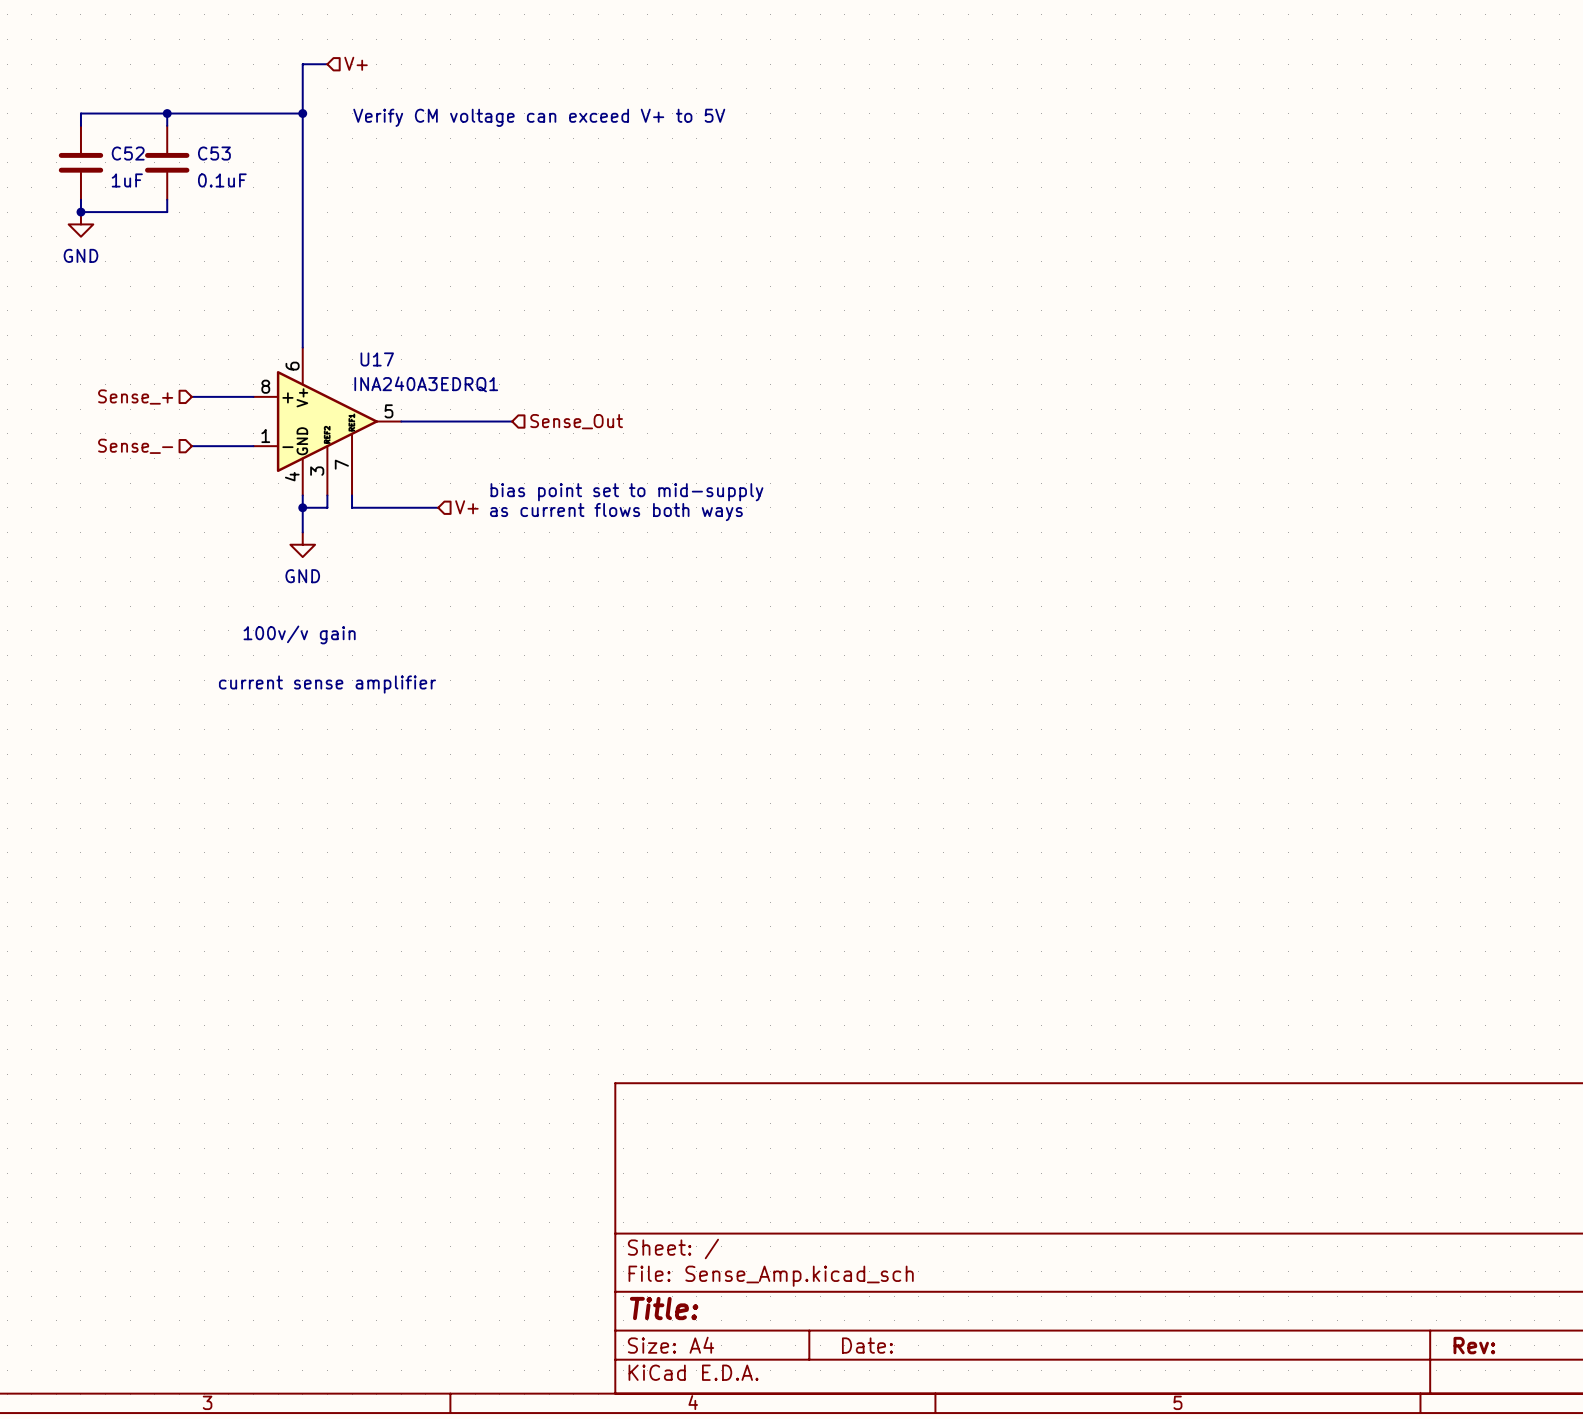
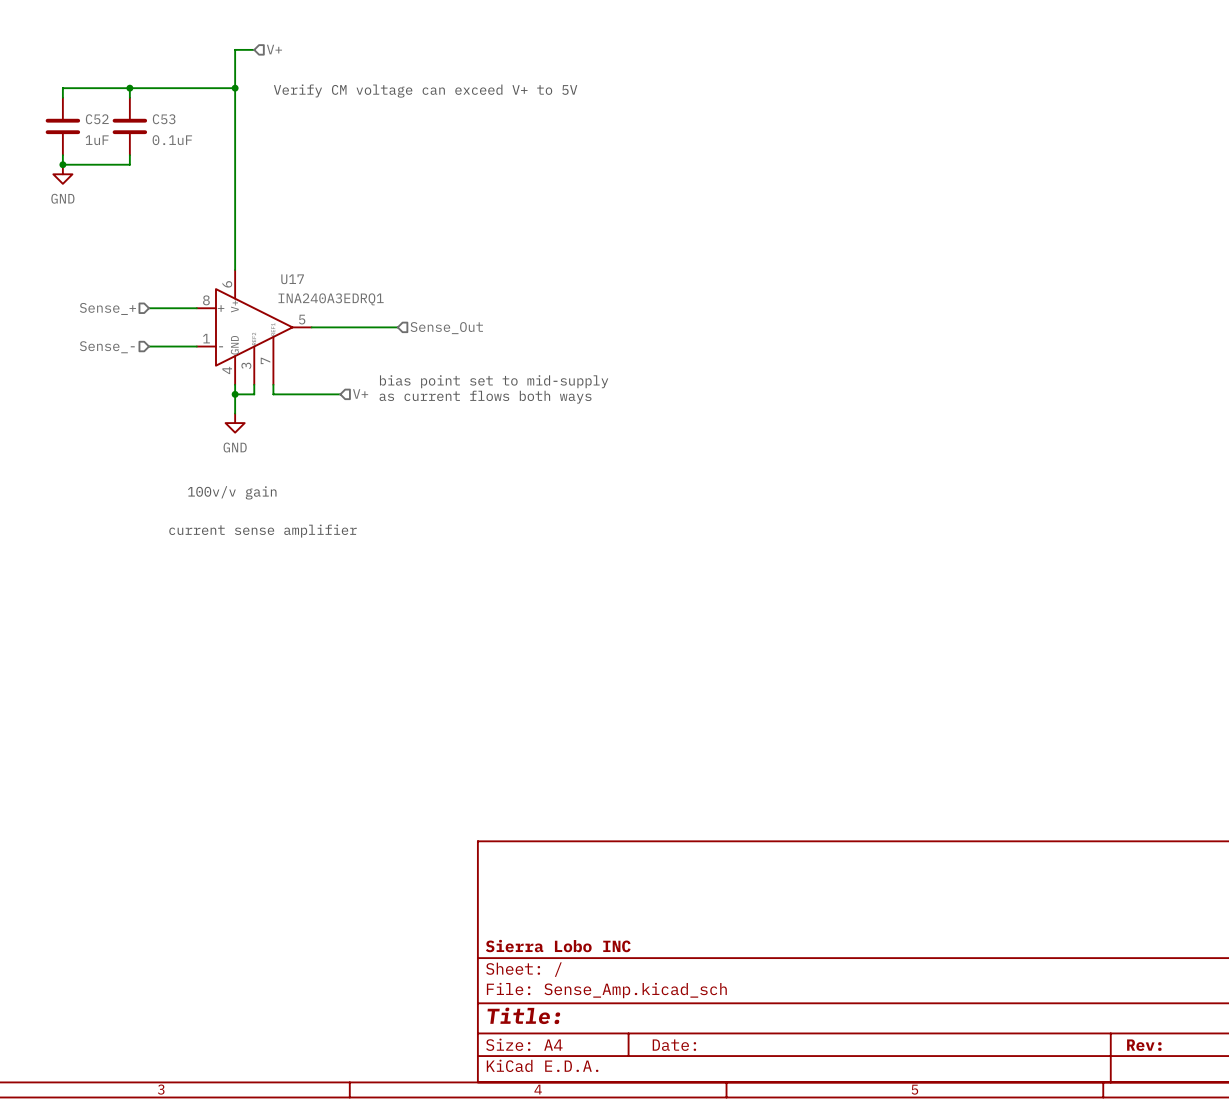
title block: none -> Sierra Lobo INC (558, 946)

